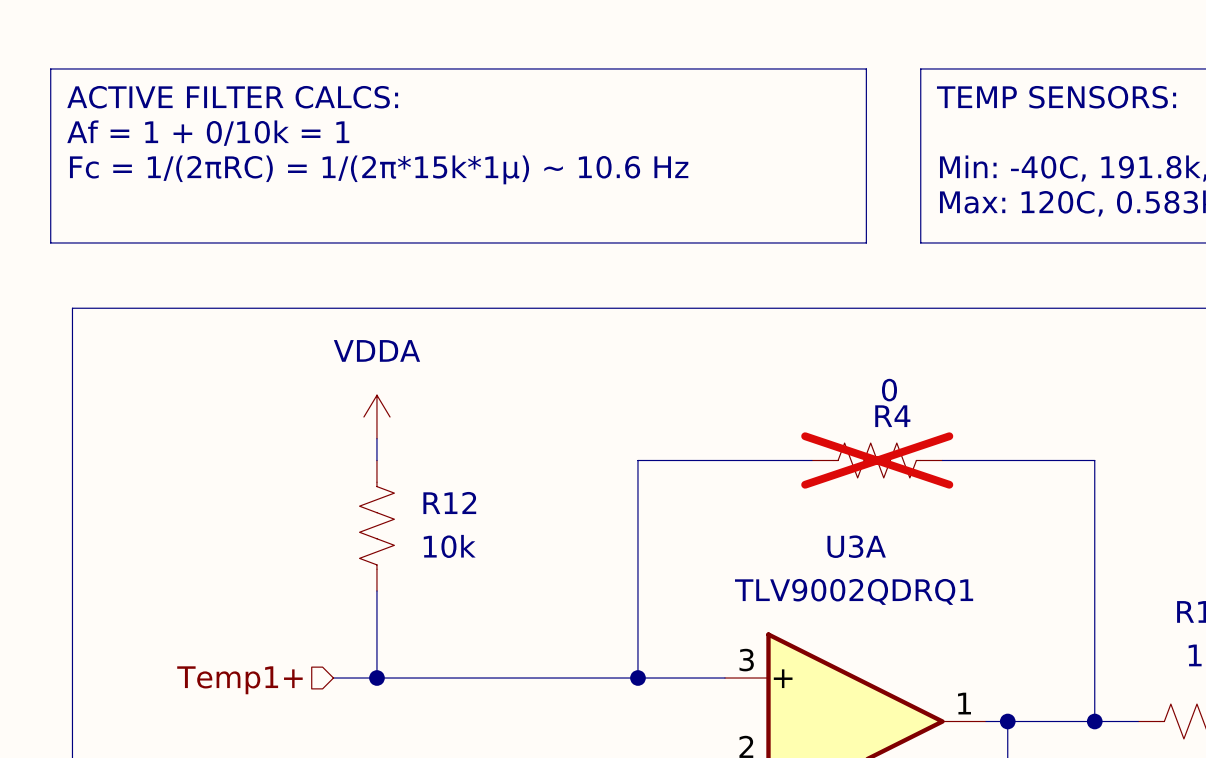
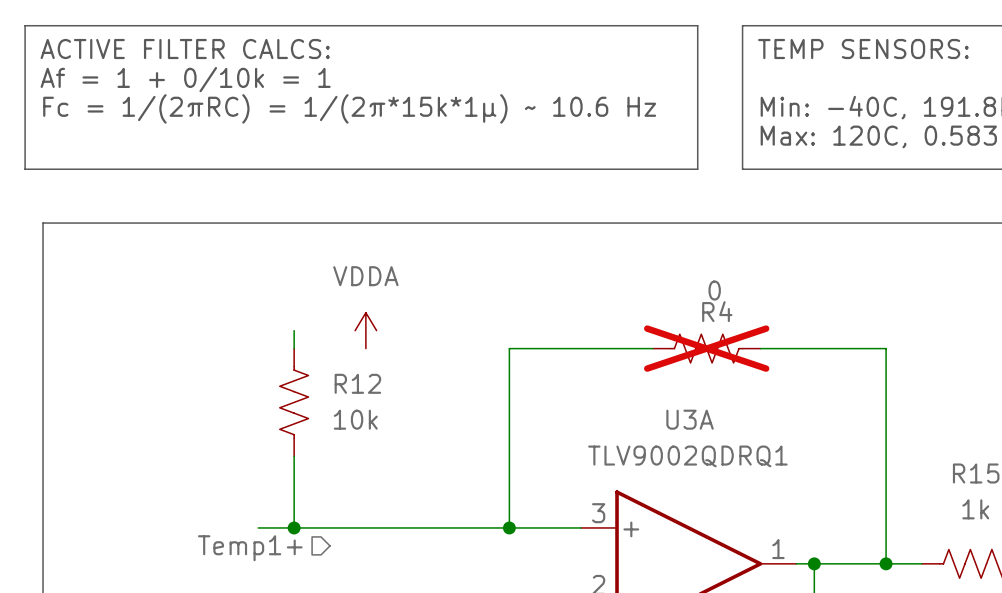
power symbol position: VDDA (376, 416) -> VDDA (365, 330)
hierarchical label position: Temp1+ (239, 680) -> Temp1+ (250, 548)

